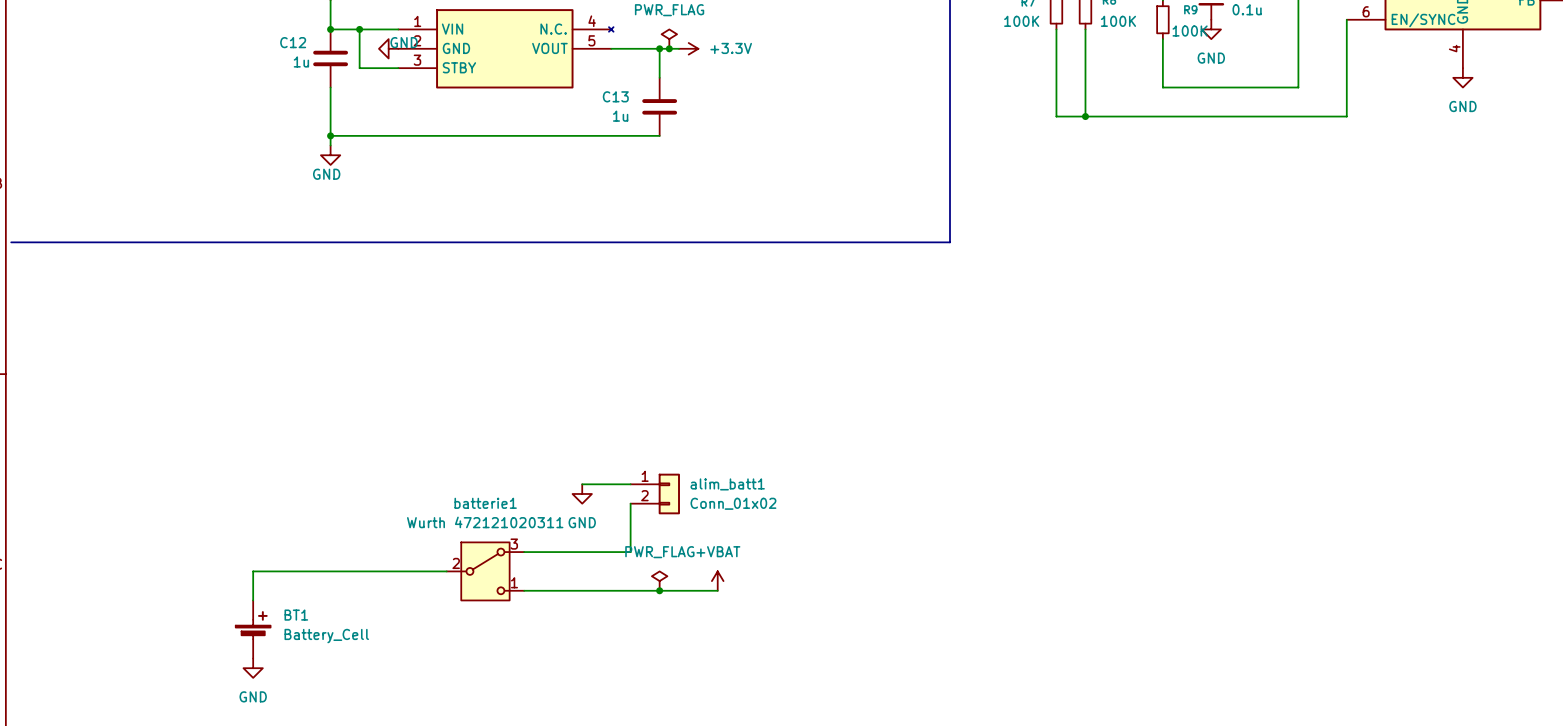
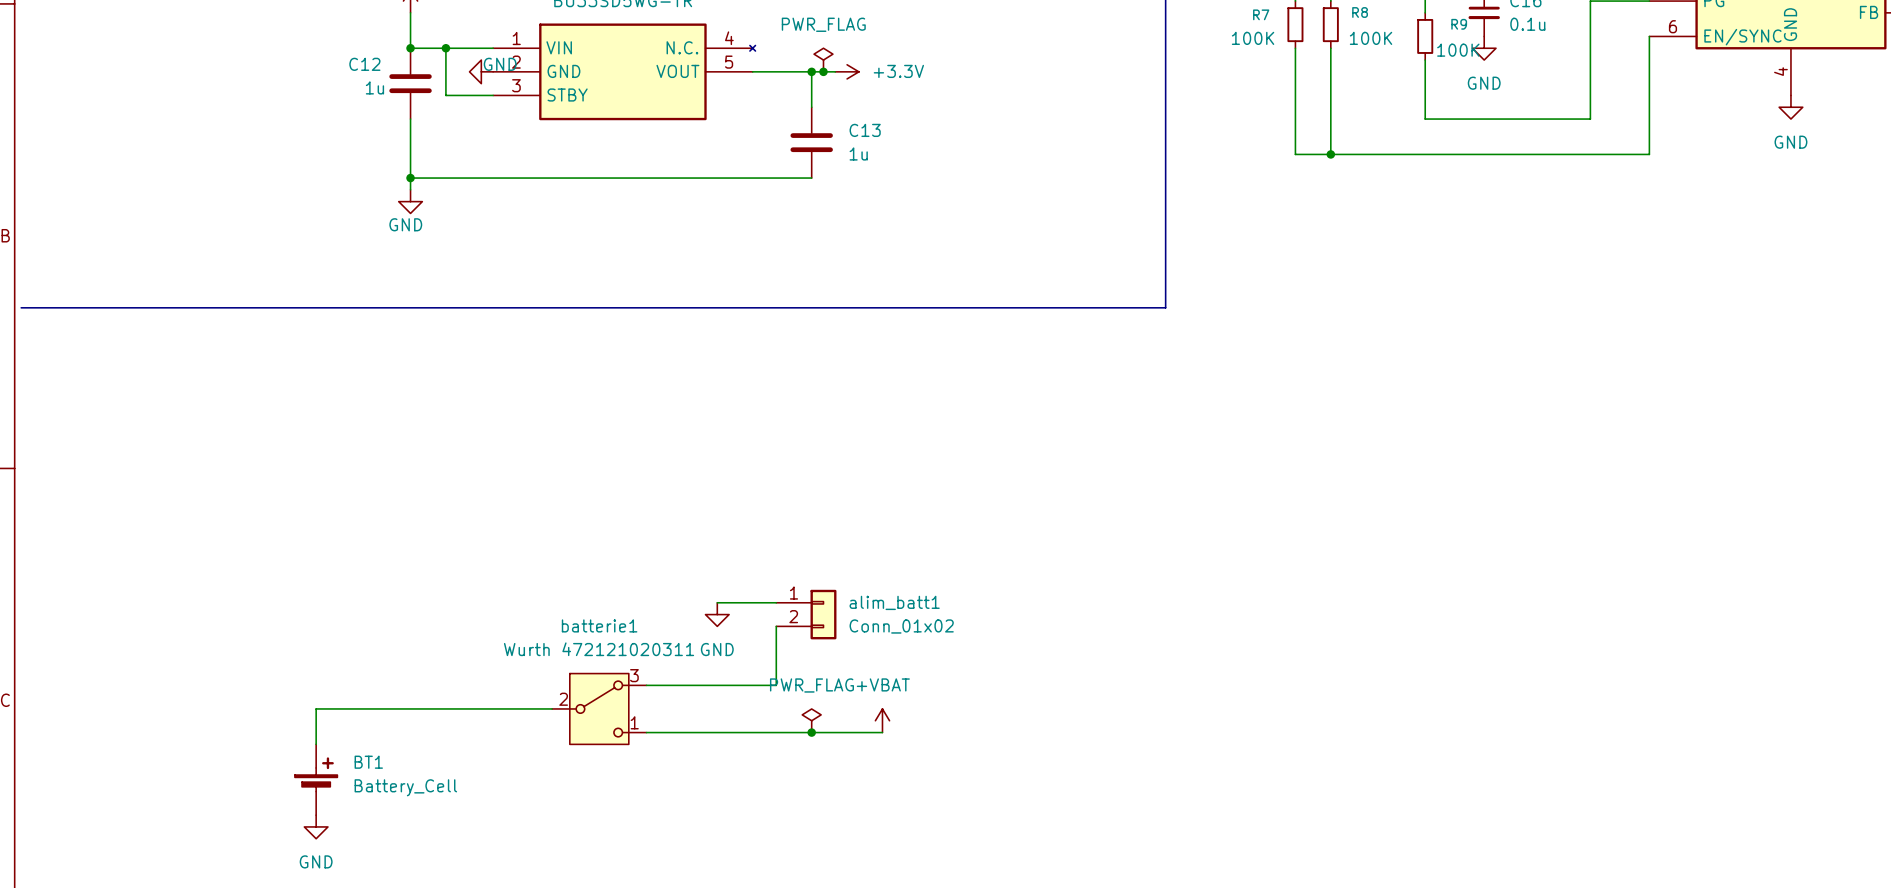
C13 name position: C13 (615, 96) -> C13 (865, 130)
C13 value position: 1u (620, 116) -> 1u (858, 153)

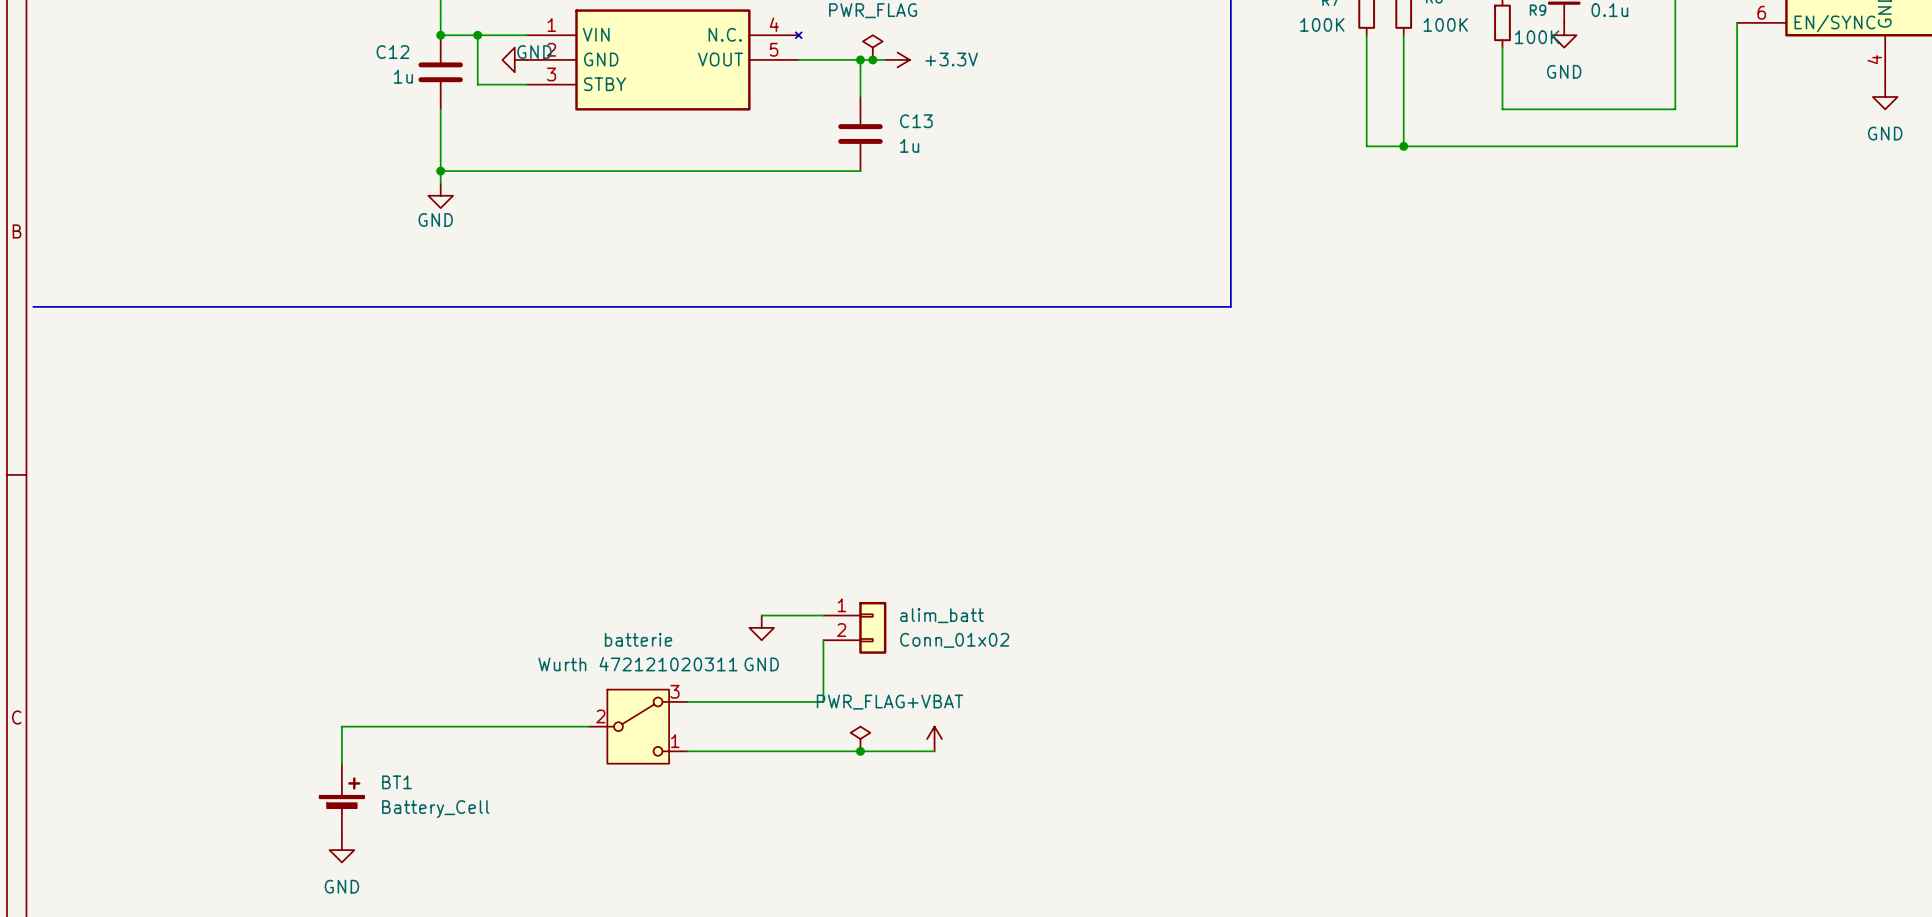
alim_batt1 name: alim_batt1 (894, 602) -> alim_batt (941, 615)
batterie1 name: batterie1 (599, 625) -> batterie (638, 639)

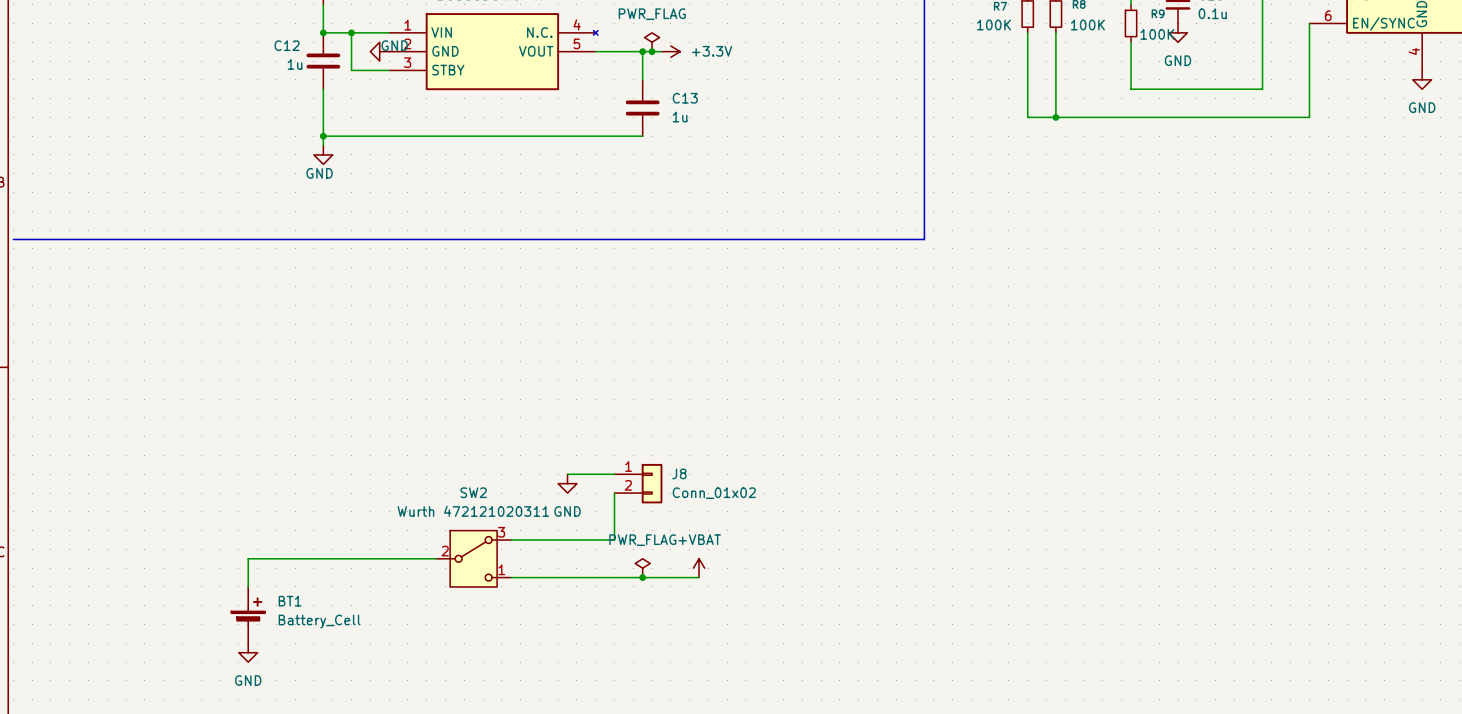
alim_batt name: alim_batt (941, 615) -> J8 (679, 473)
batterie name: batterie (638, 639) -> SW2 (473, 492)

